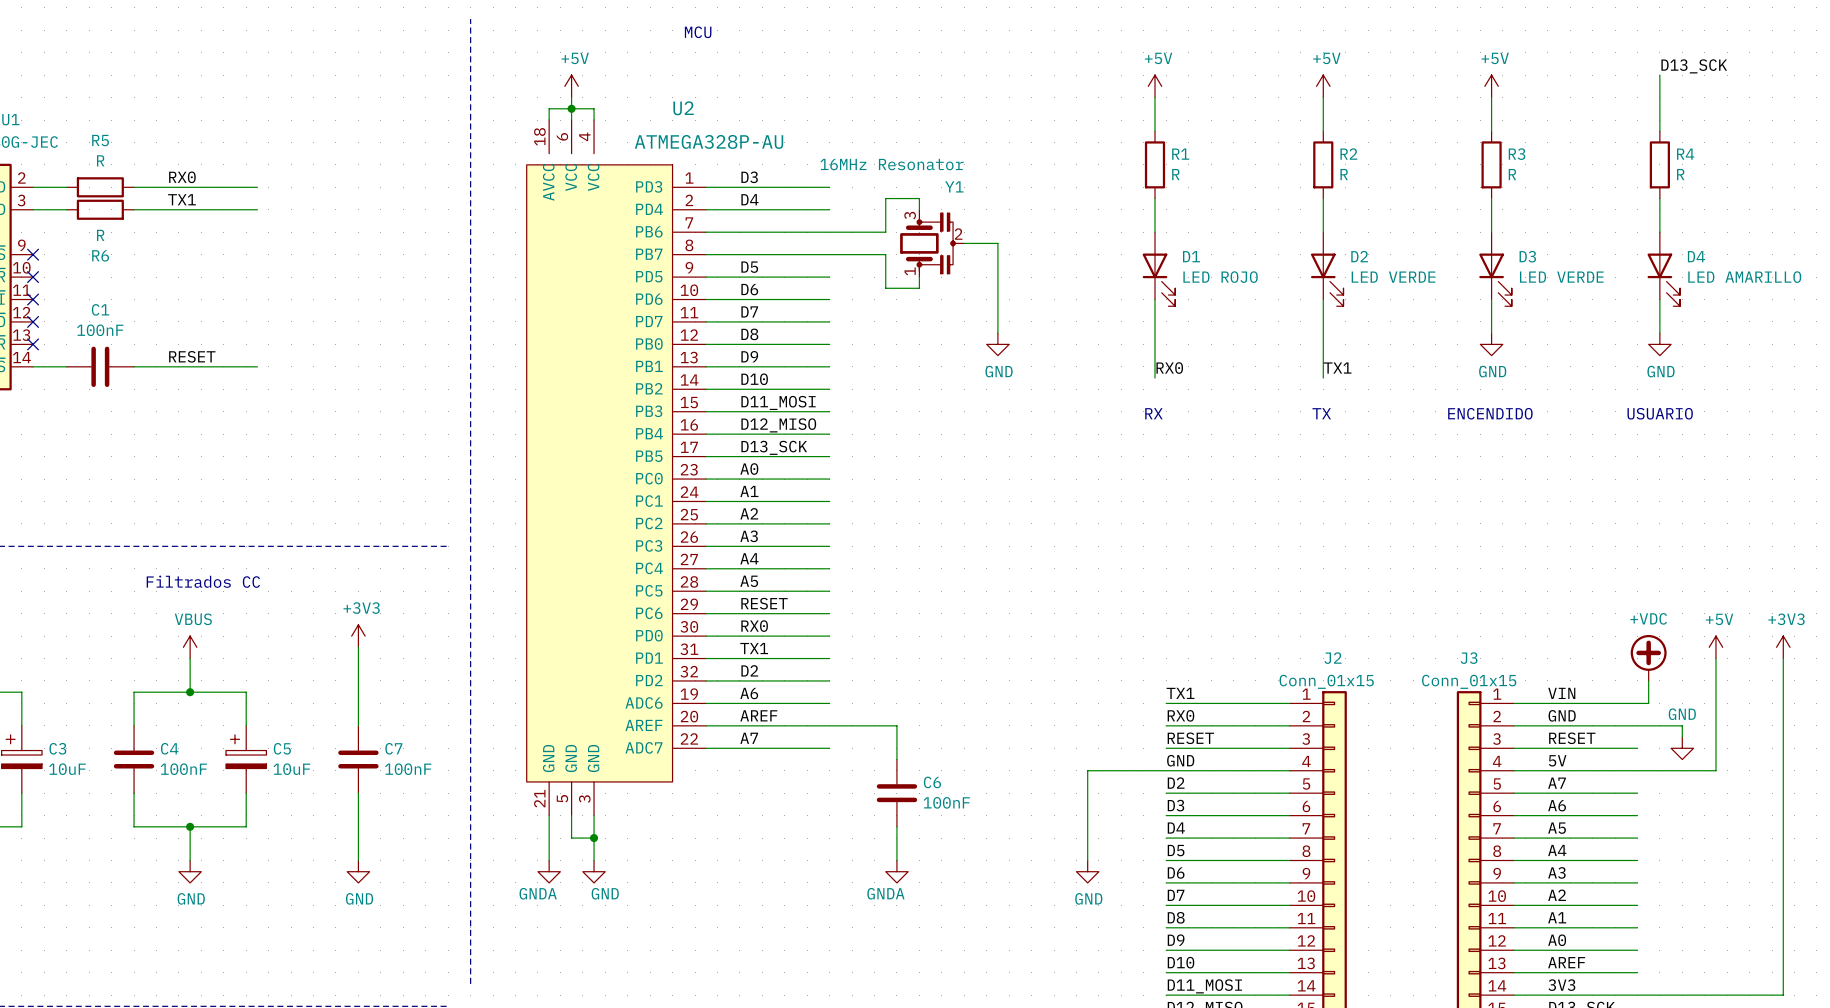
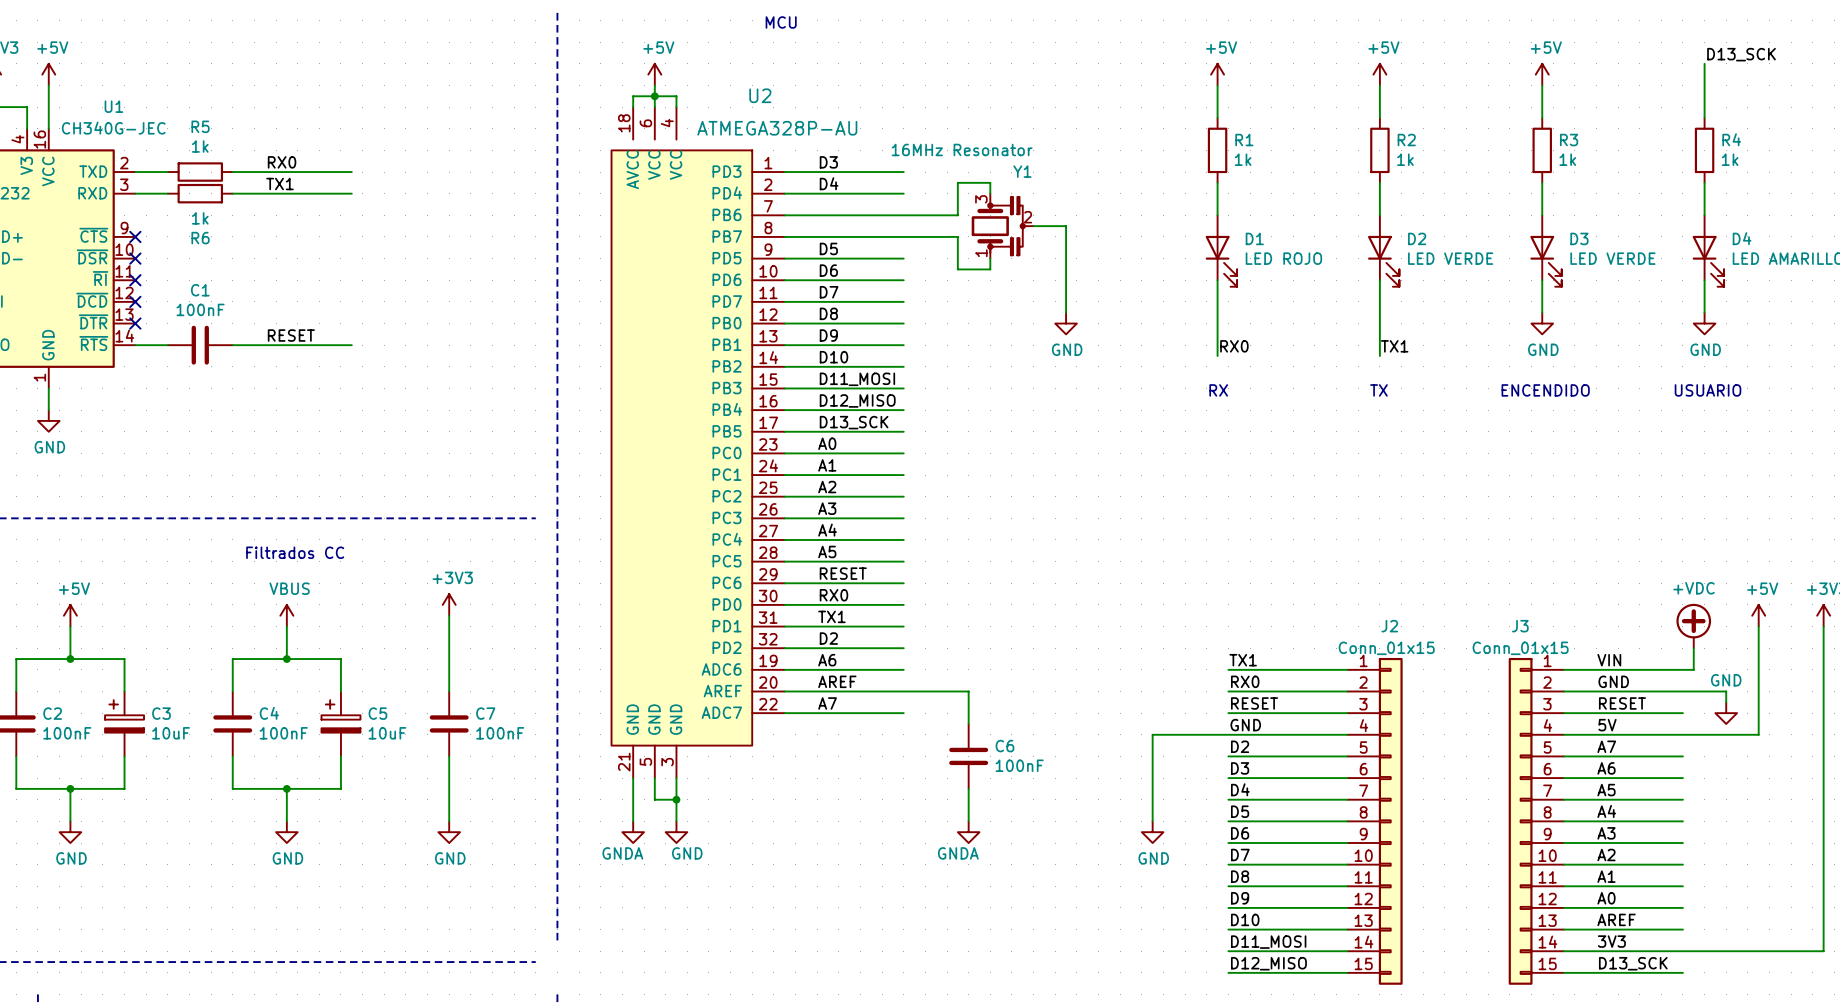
R5 value: R (100, 160) -> 1k (200, 146)
R1 value: R (1175, 174) -> 1k (1243, 159)
R2 value: R (1344, 174) -> 1k (1405, 159)
R3 value: R (1512, 174) -> 1k (1567, 159)
R4 value: R (1680, 174) -> 1k (1730, 159)
R6 value: R (100, 235) -> 1k (200, 218)

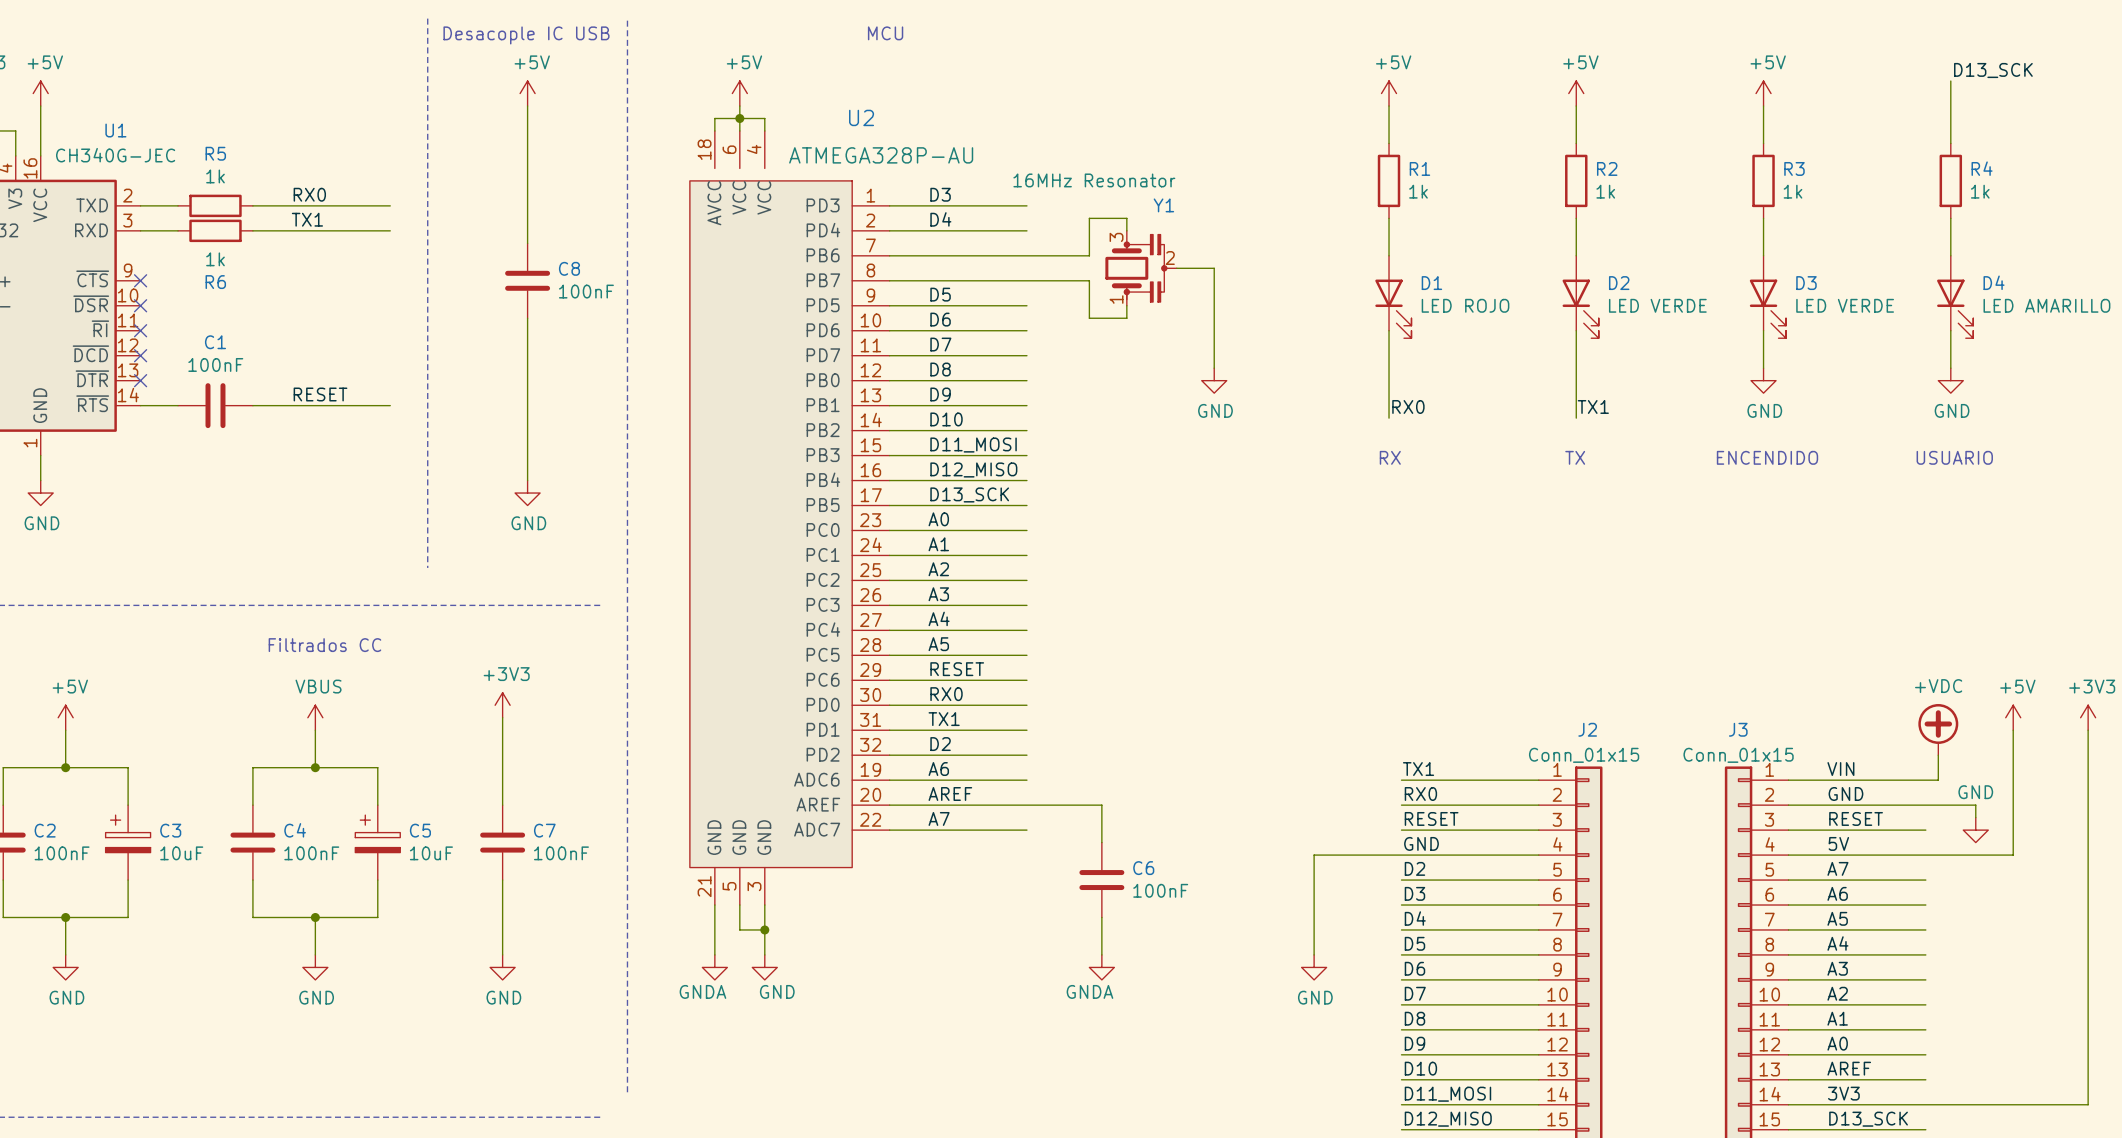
line: none -> (427, 18) (427, 567)
text: none -> Desacople IC USB (526, 35)
power symbol: none -> +5V (527, 93)
wire: none -> (527, 106) (527, 243)
C8: none -> 100nF (527, 280)
wire: none -> (527, 318) (527, 480)
power symbol: none -> GND (527, 493)

